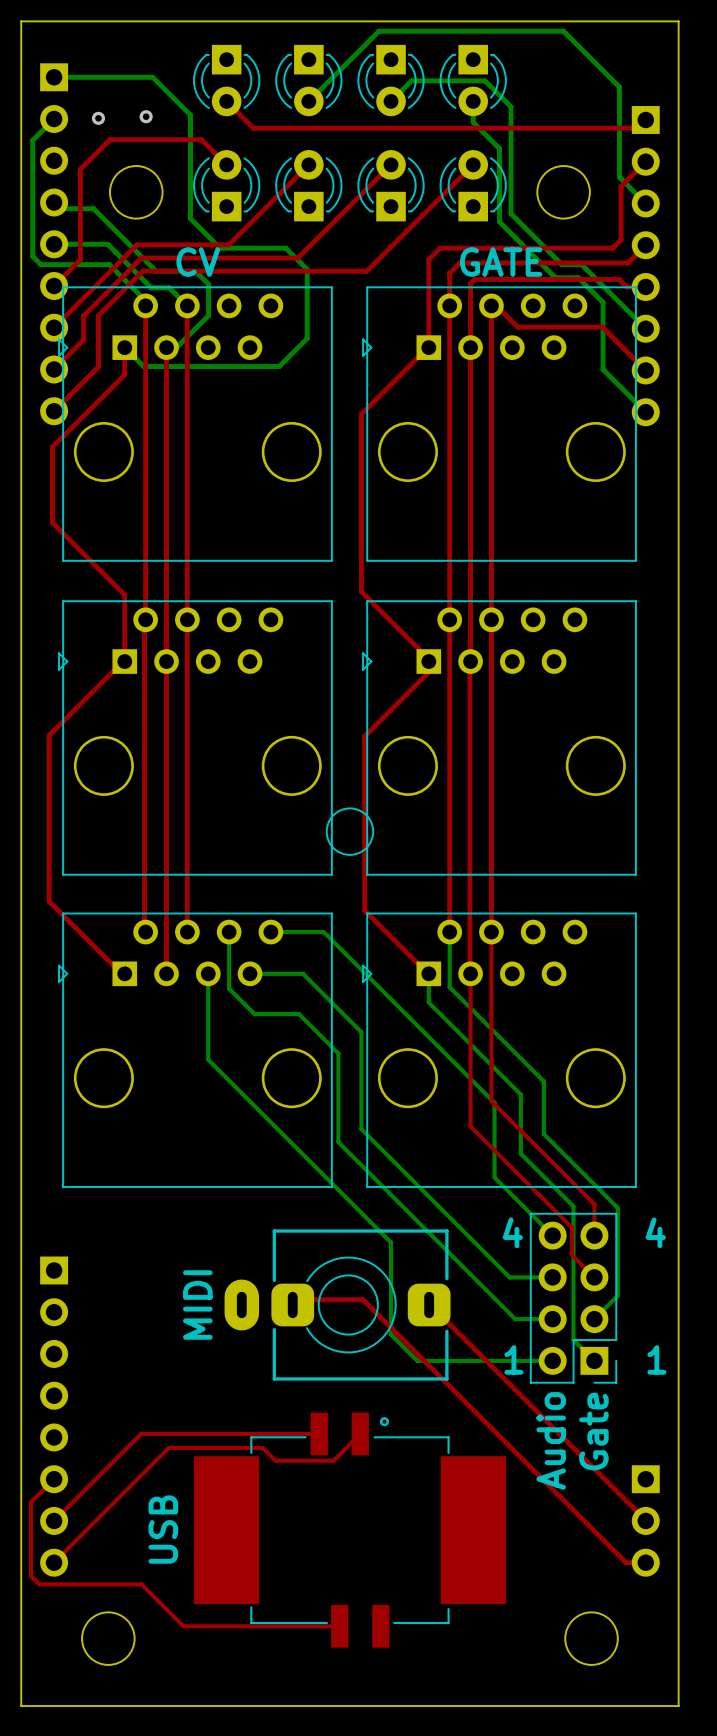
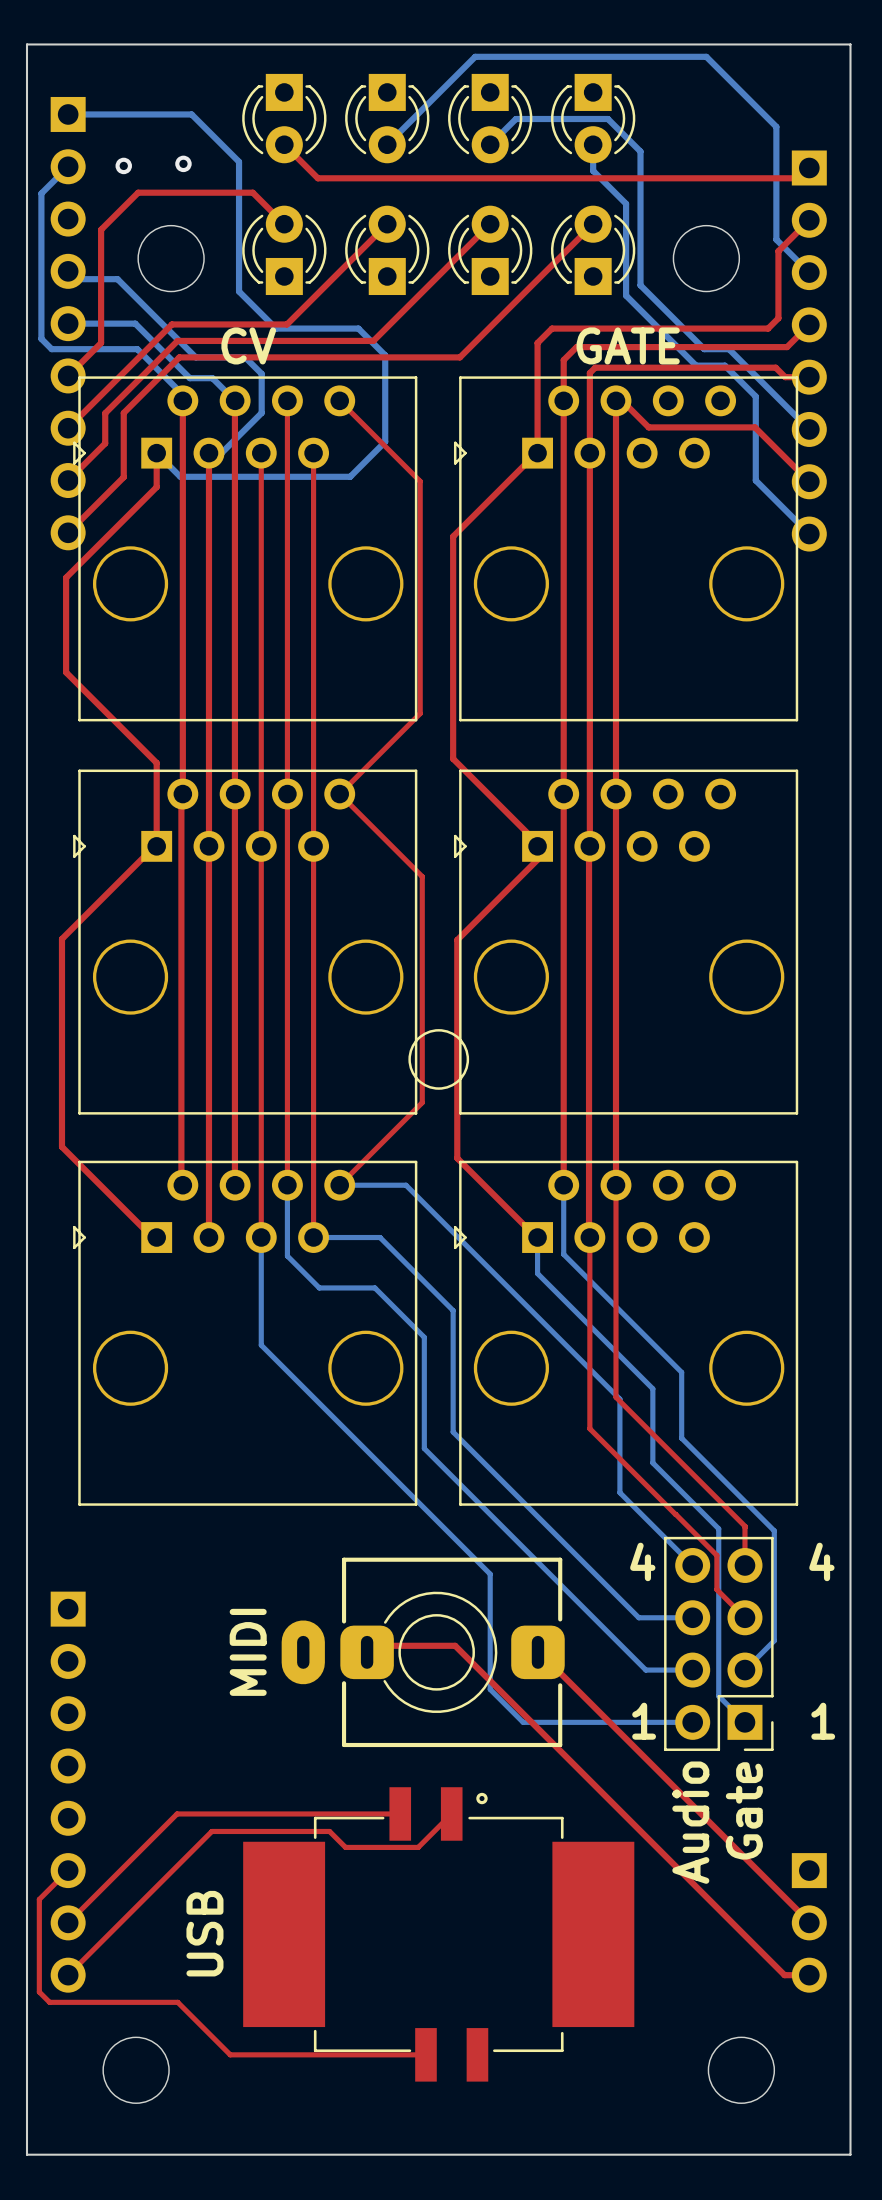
top track: none -> (287, 400) (287, 1185)
top track: none -> (339, 400) (420, 481) (420, 713) (339, 794) (422, 876) (422, 1102) (339, 1185)
top track: none -> (261, 453) (261, 1237)
top track: none -> (313, 453) (313, 1237)

